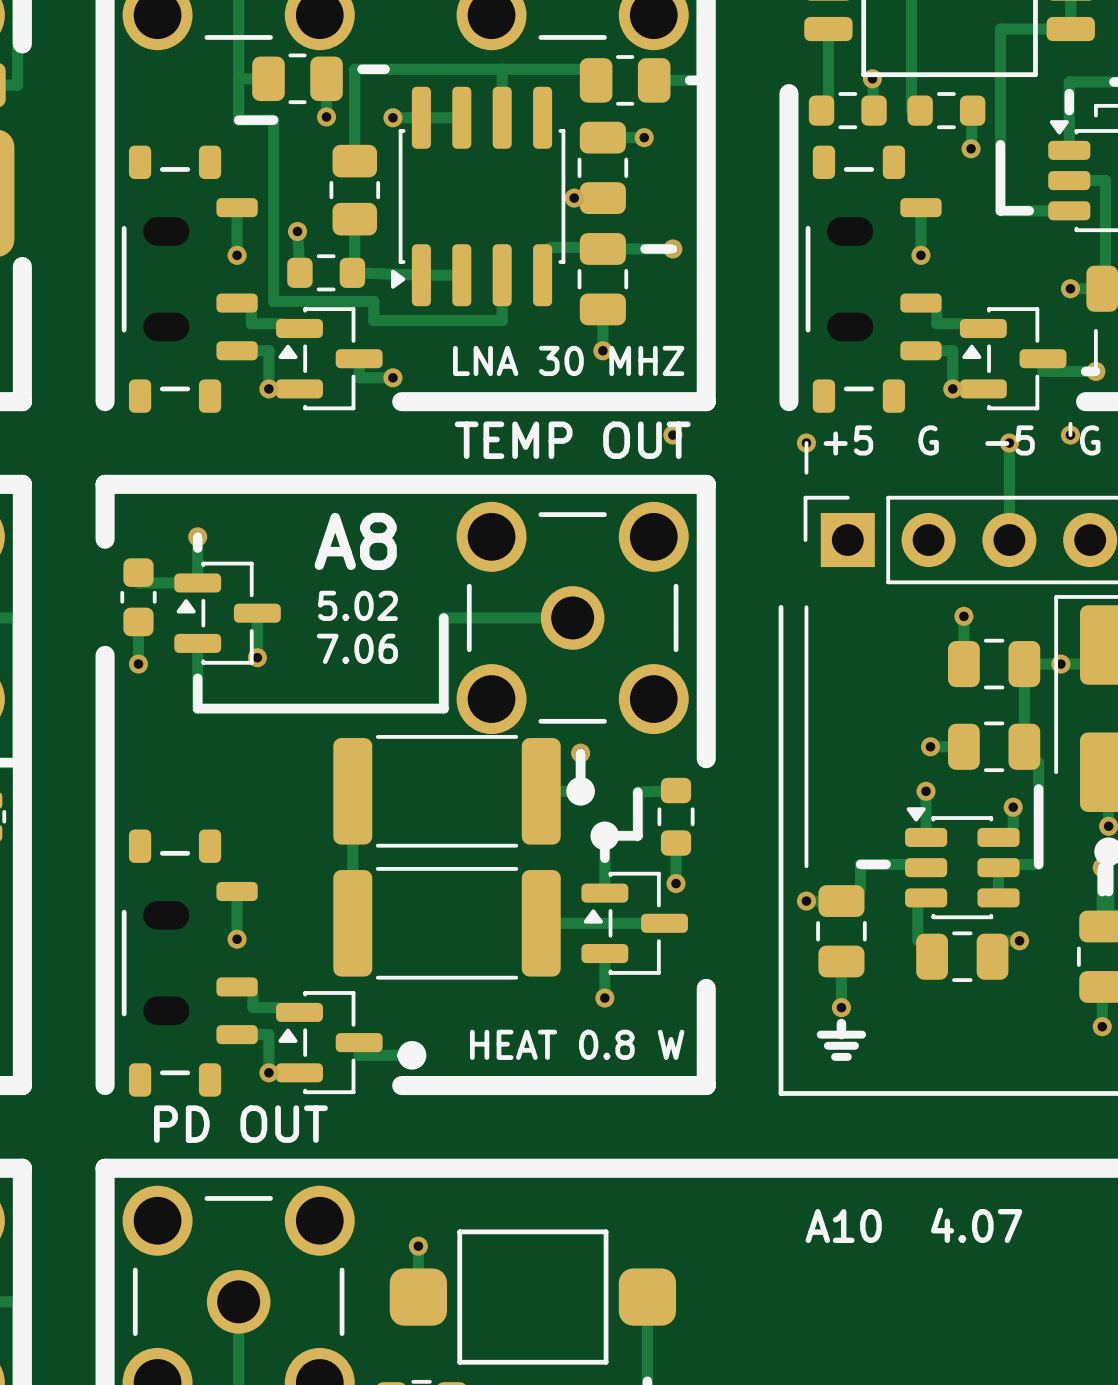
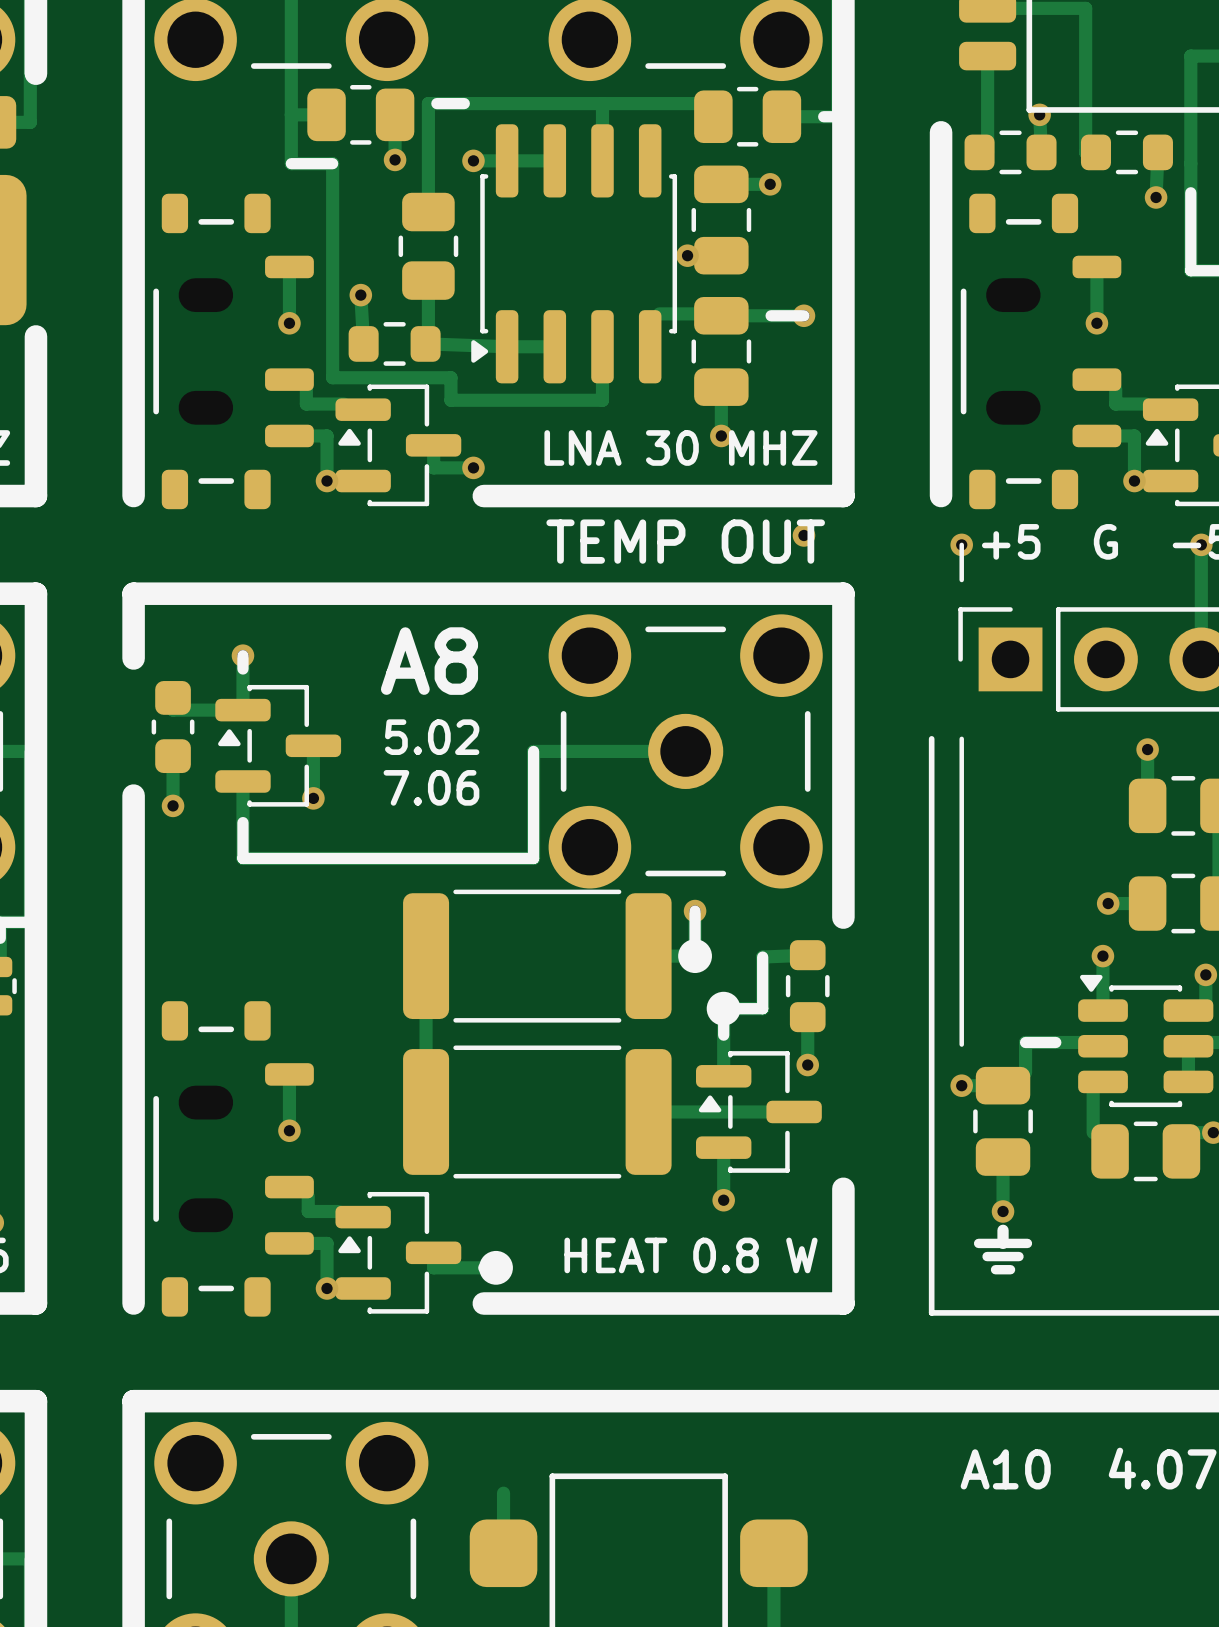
text: PD OUT (240, 1124) -> none
via: (418, 1246) -> none

